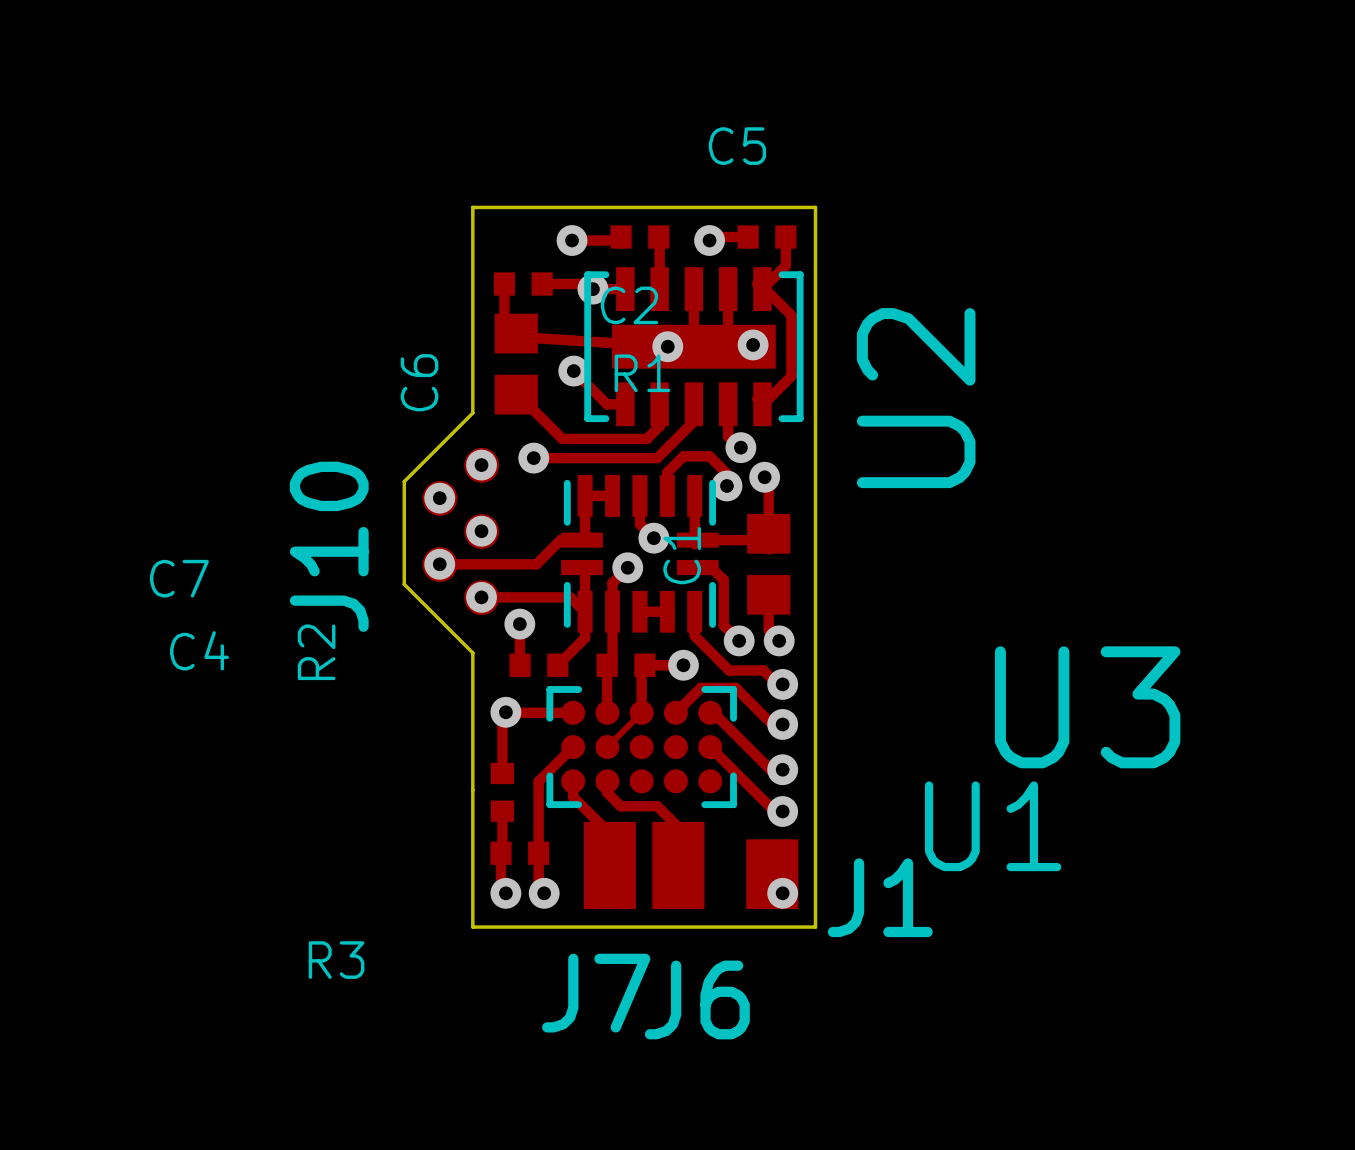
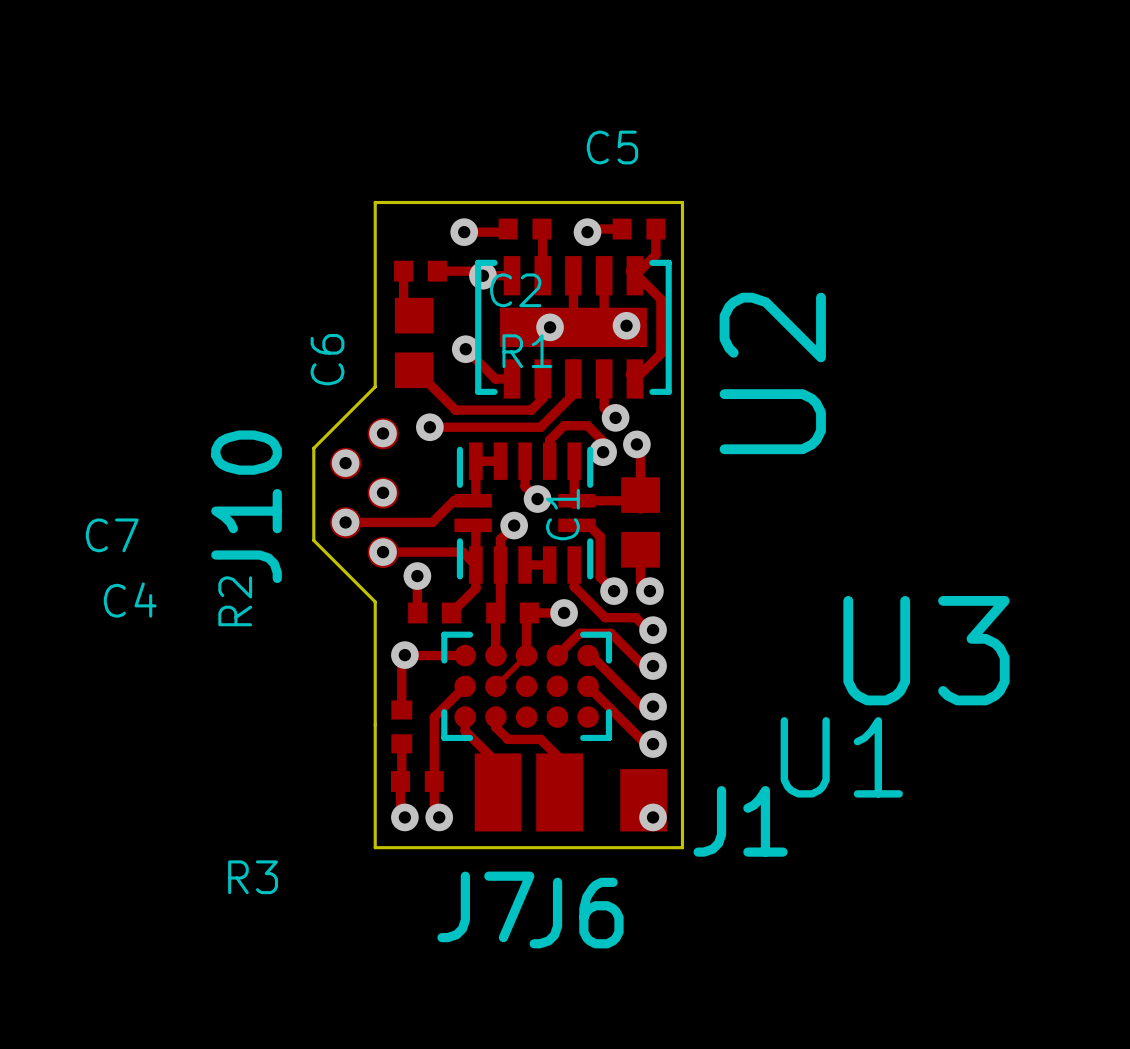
track: (519, 337) (667, 346) -> none

